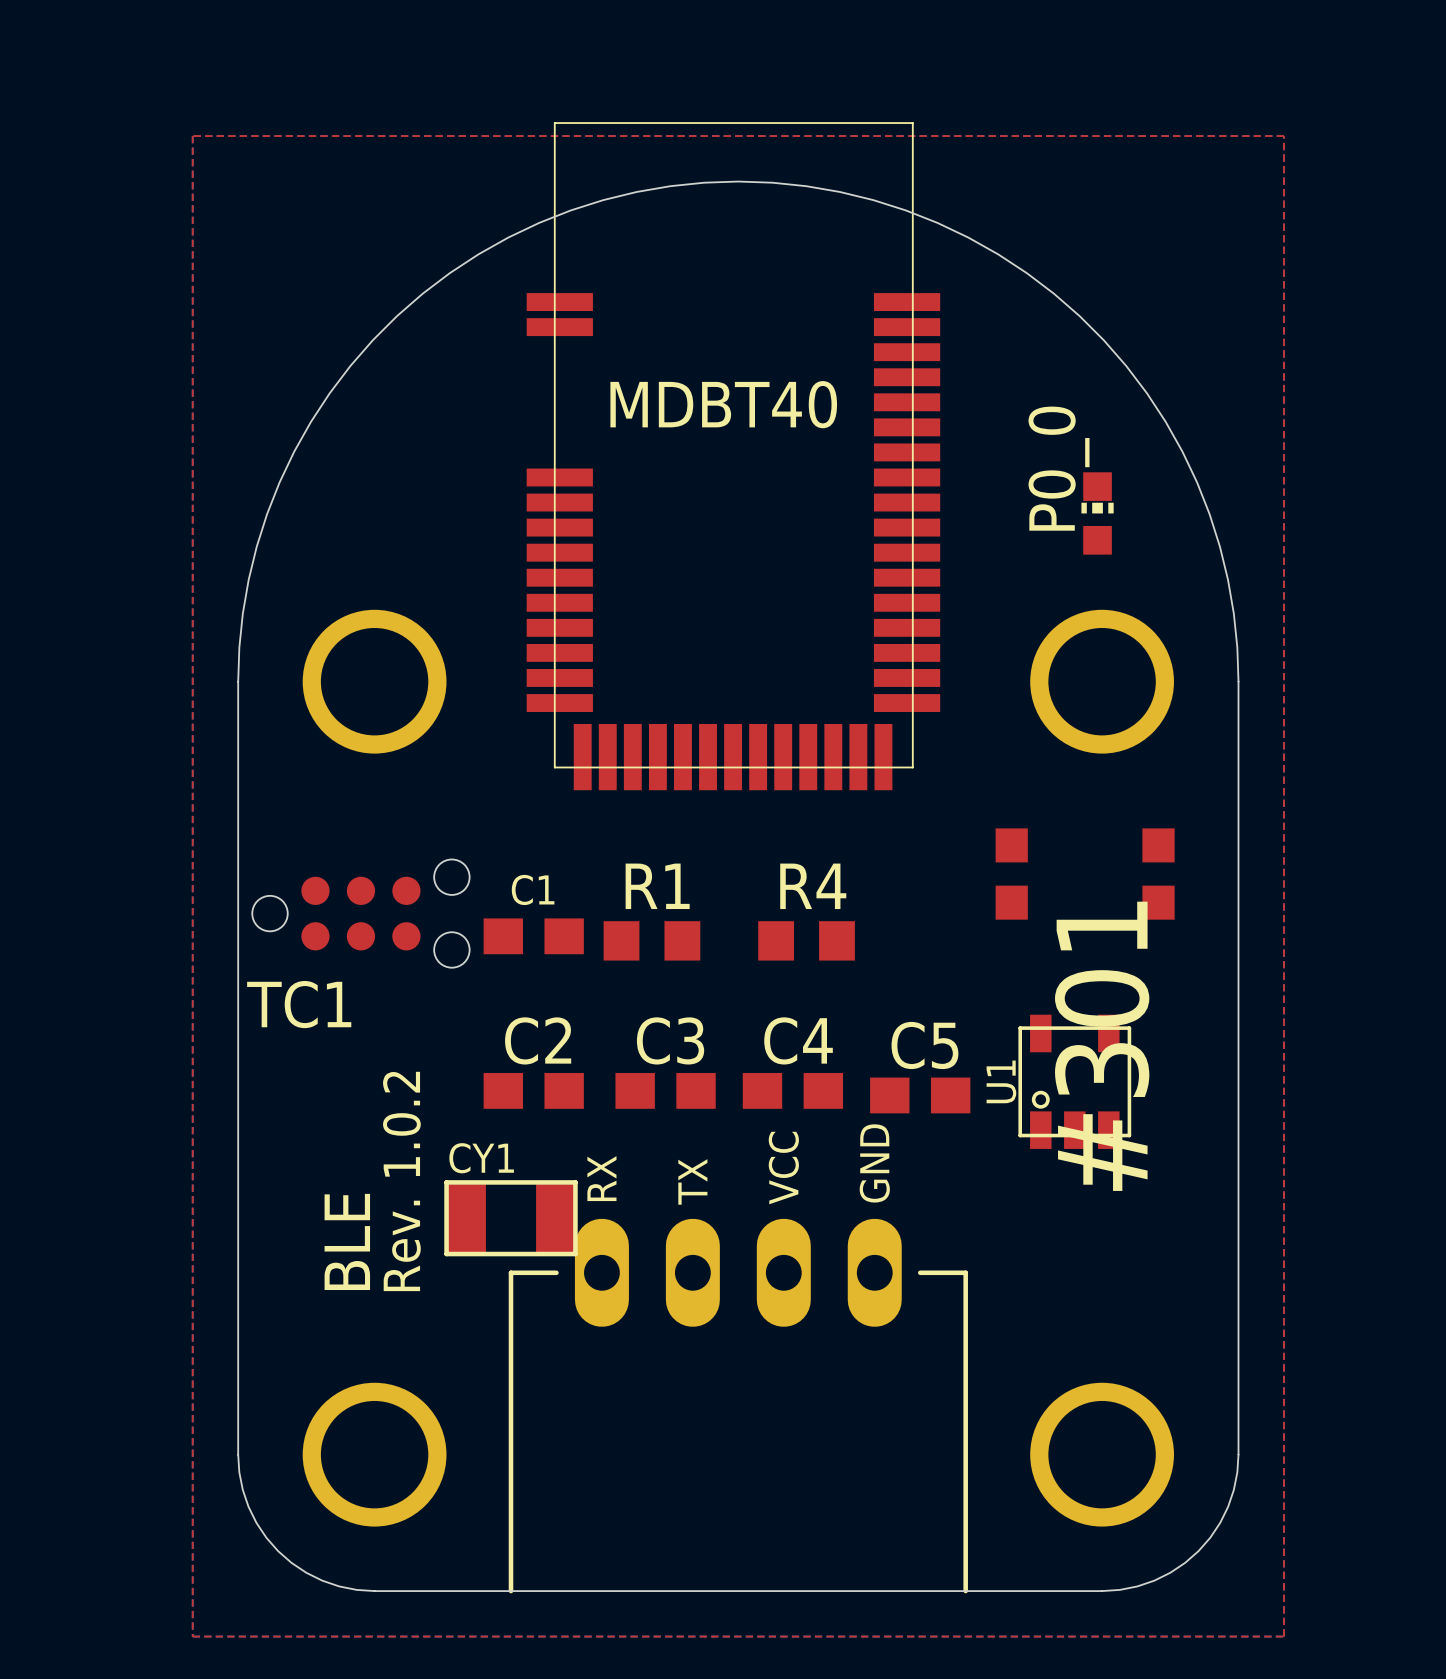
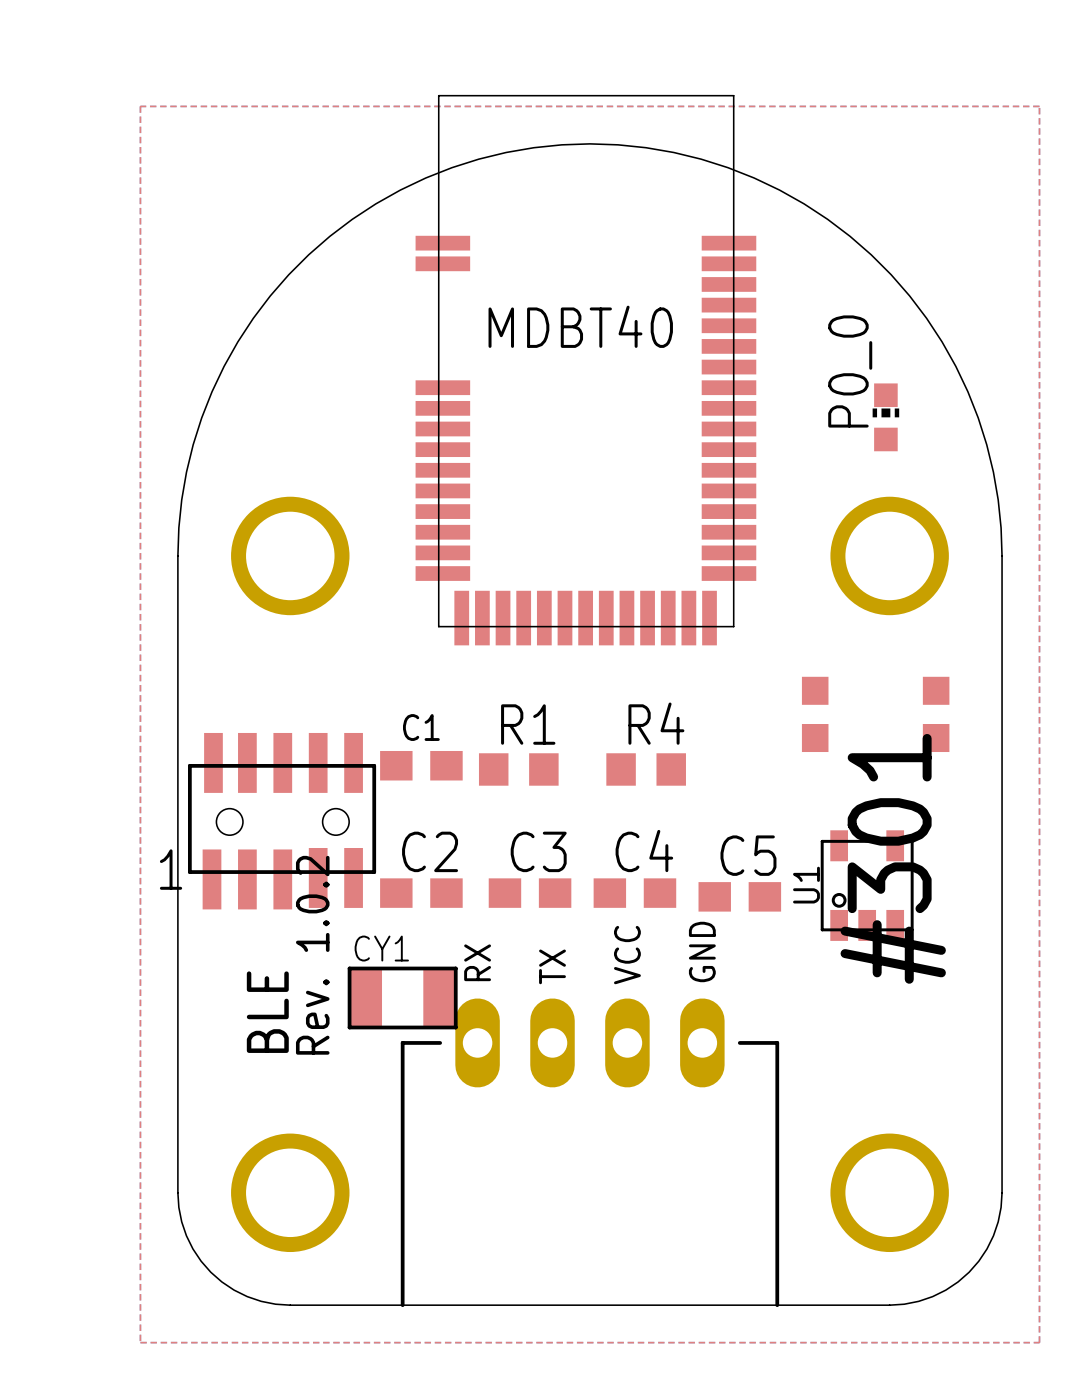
TC1: (360, 913) -> none
part: none -> (282, 821)

